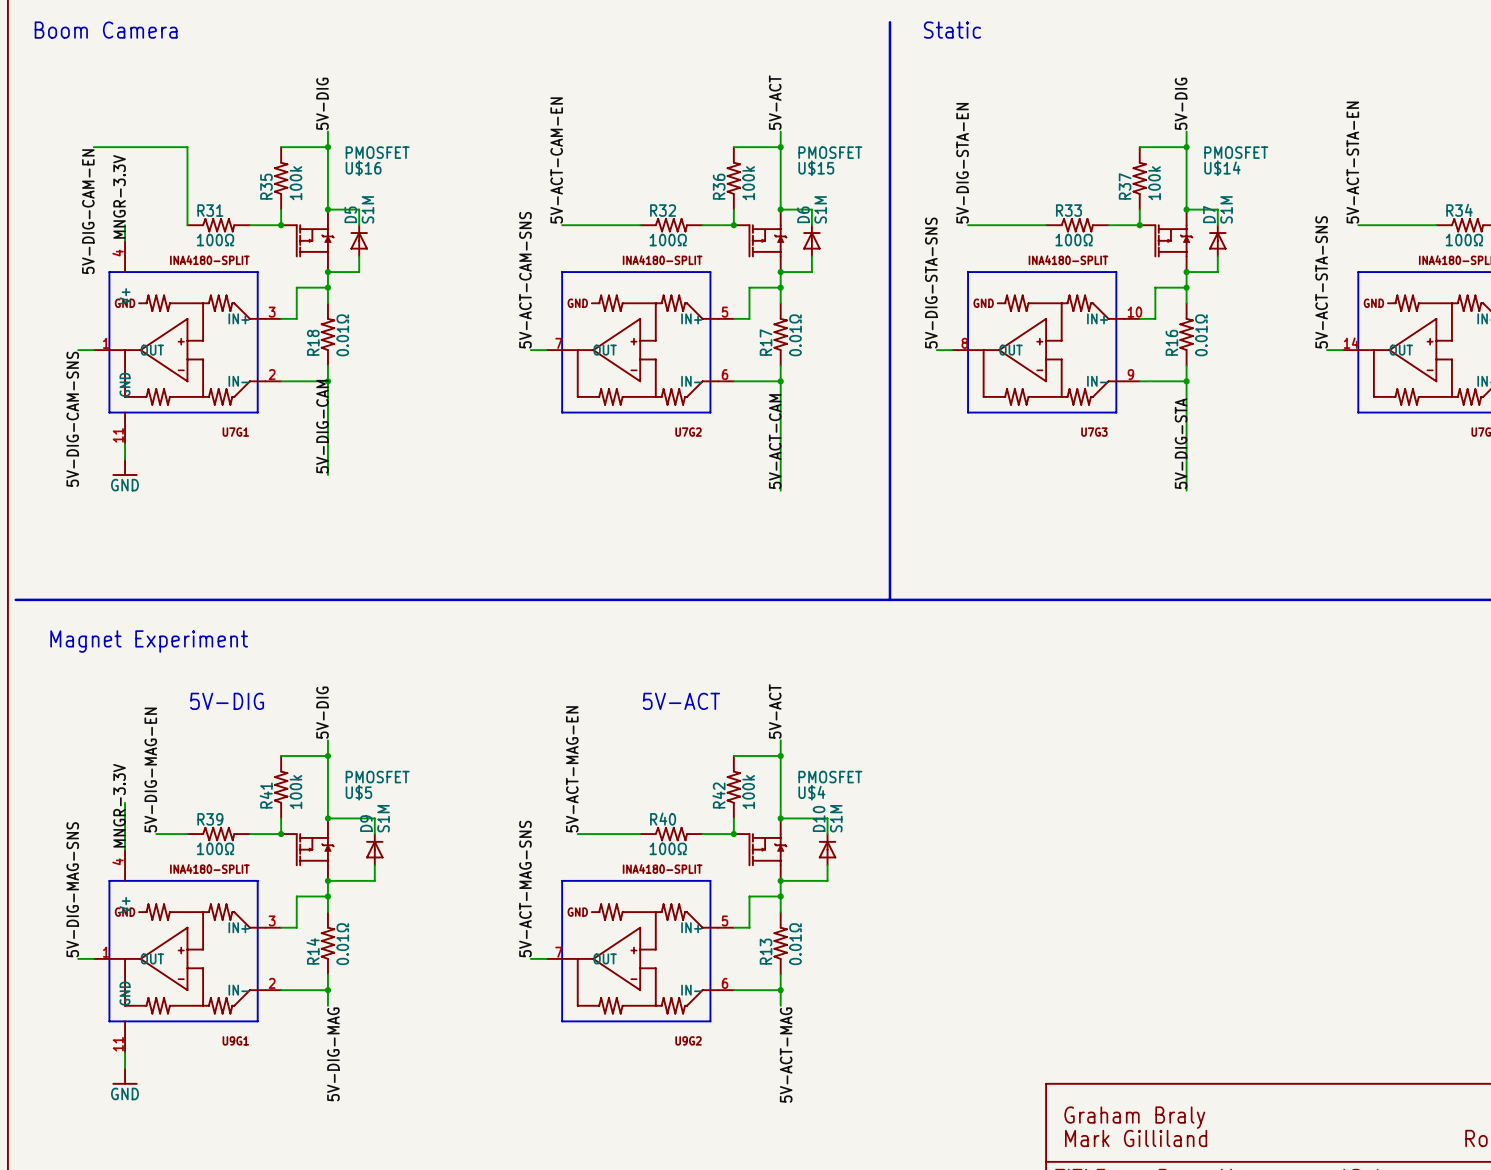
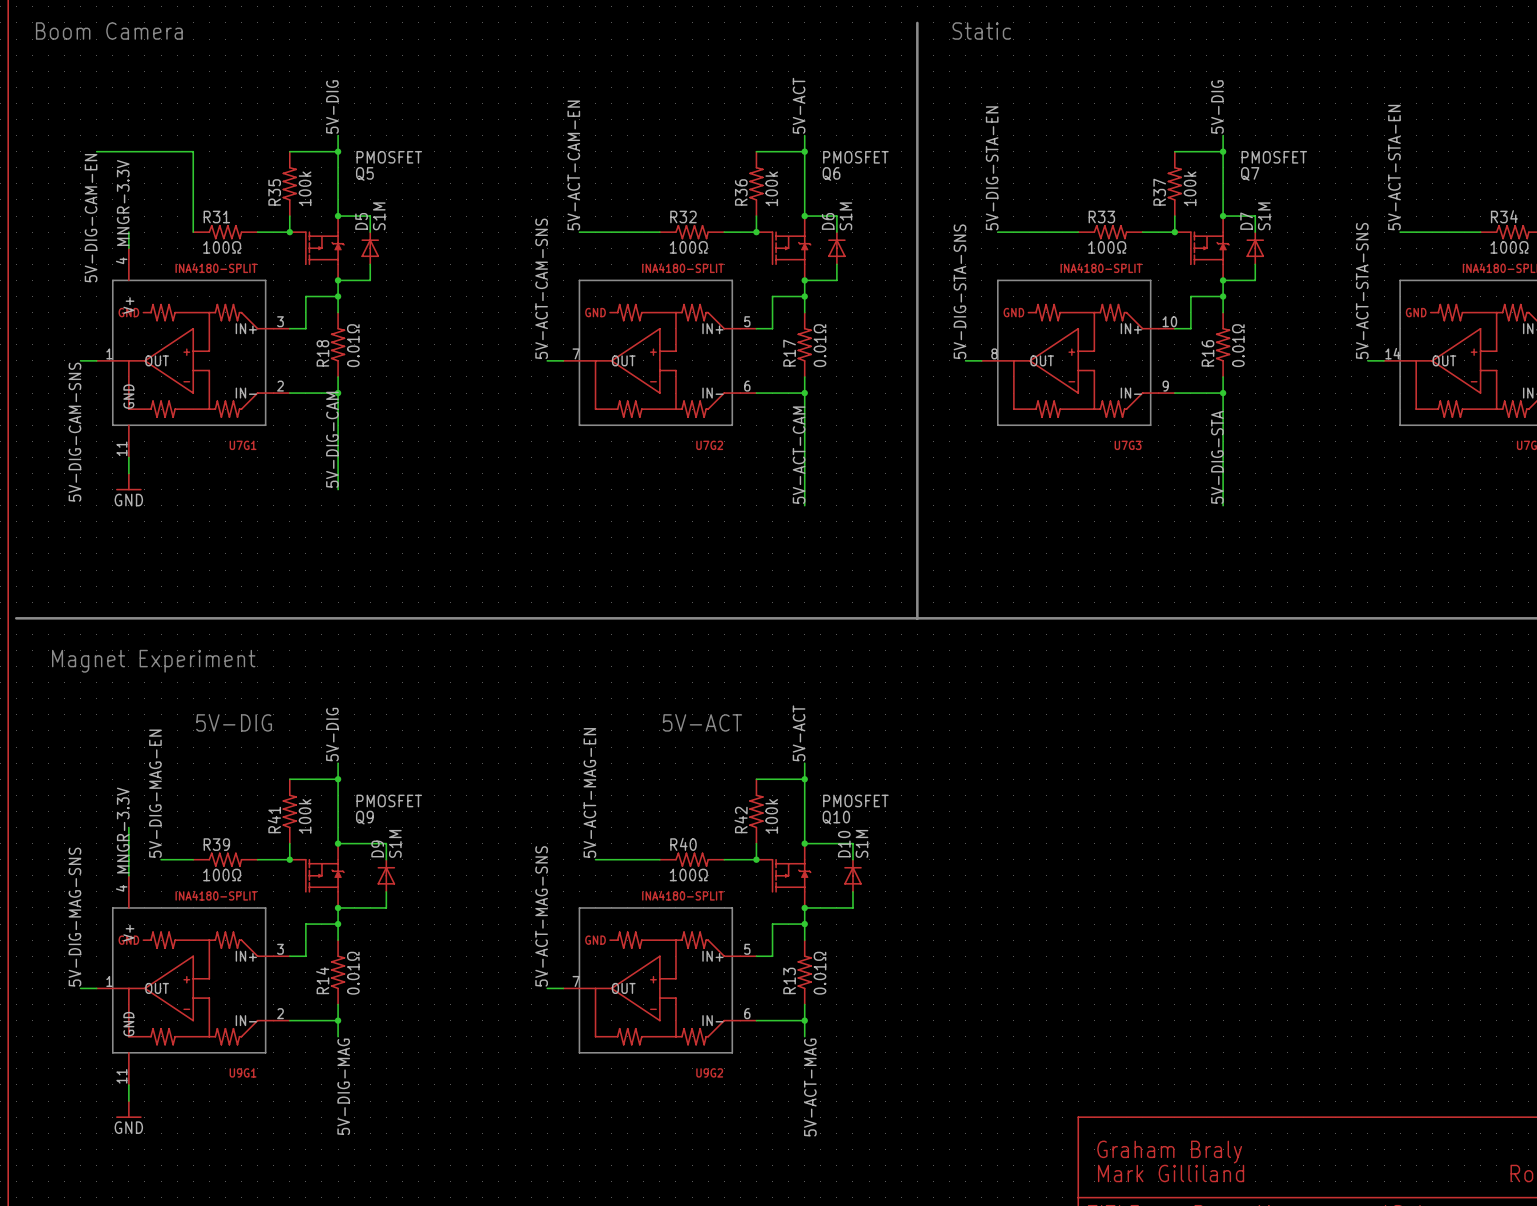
U$16 name: U$16 (363, 168) -> Q5 (364, 173)
U$15 name: U$15 (816, 168) -> Q6 (831, 173)
U$14 name: U$14 (1222, 168) -> Q7 (1250, 173)
U$5 name: U$5 (358, 792) -> Q9 (364, 817)
U$4 name: U$4 (811, 792) -> Q10 (836, 817)

